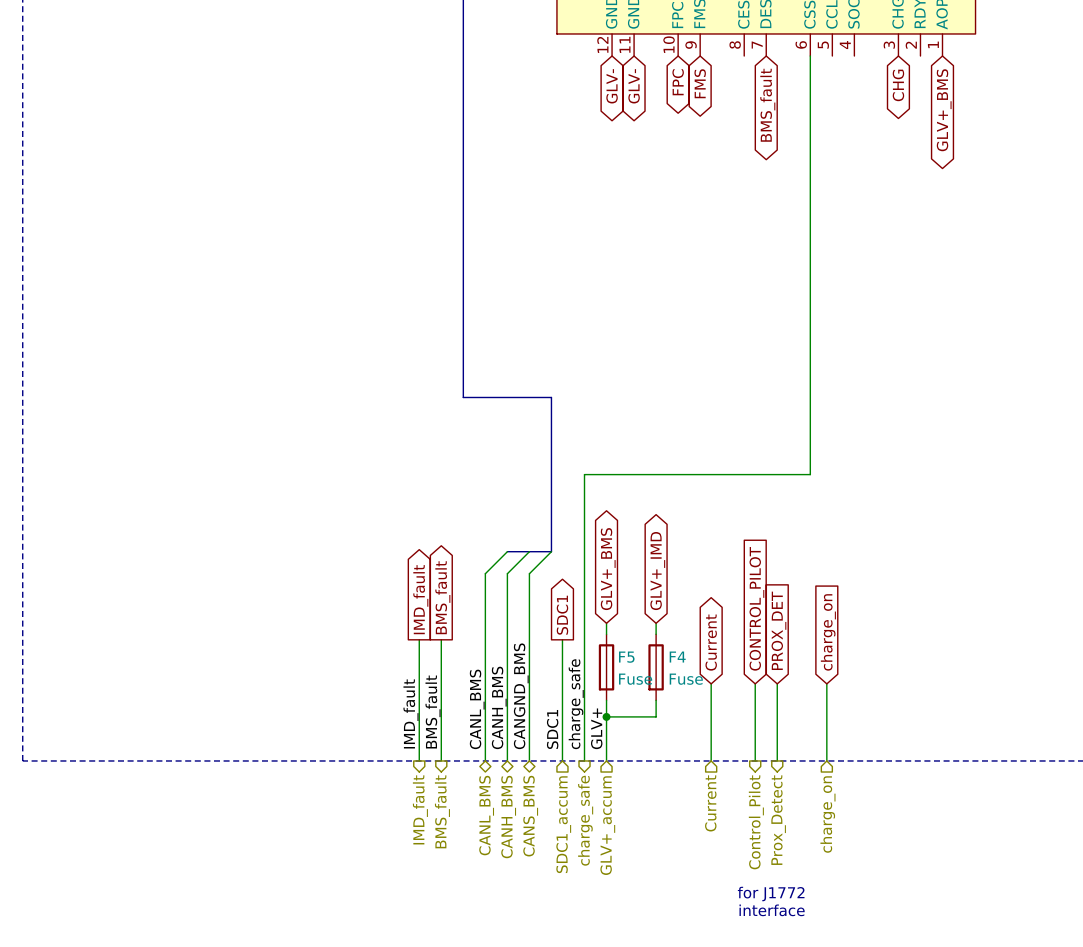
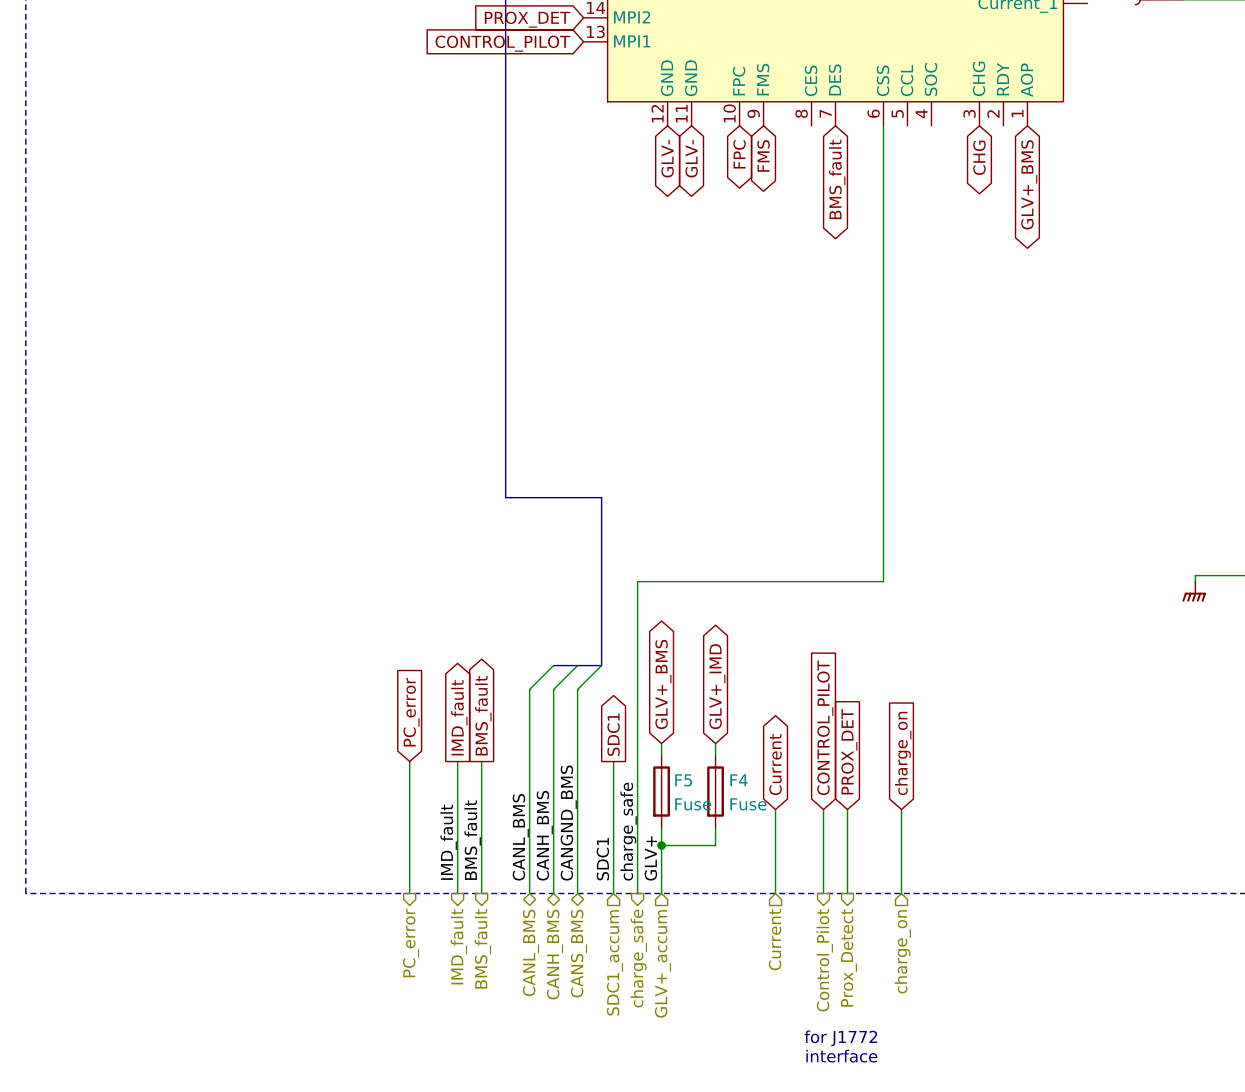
global label: none -> PC_error (411, 712)
wire: none -> (409, 761) (409, 893)
hierarchical label: none -> PC_error (411, 942)

